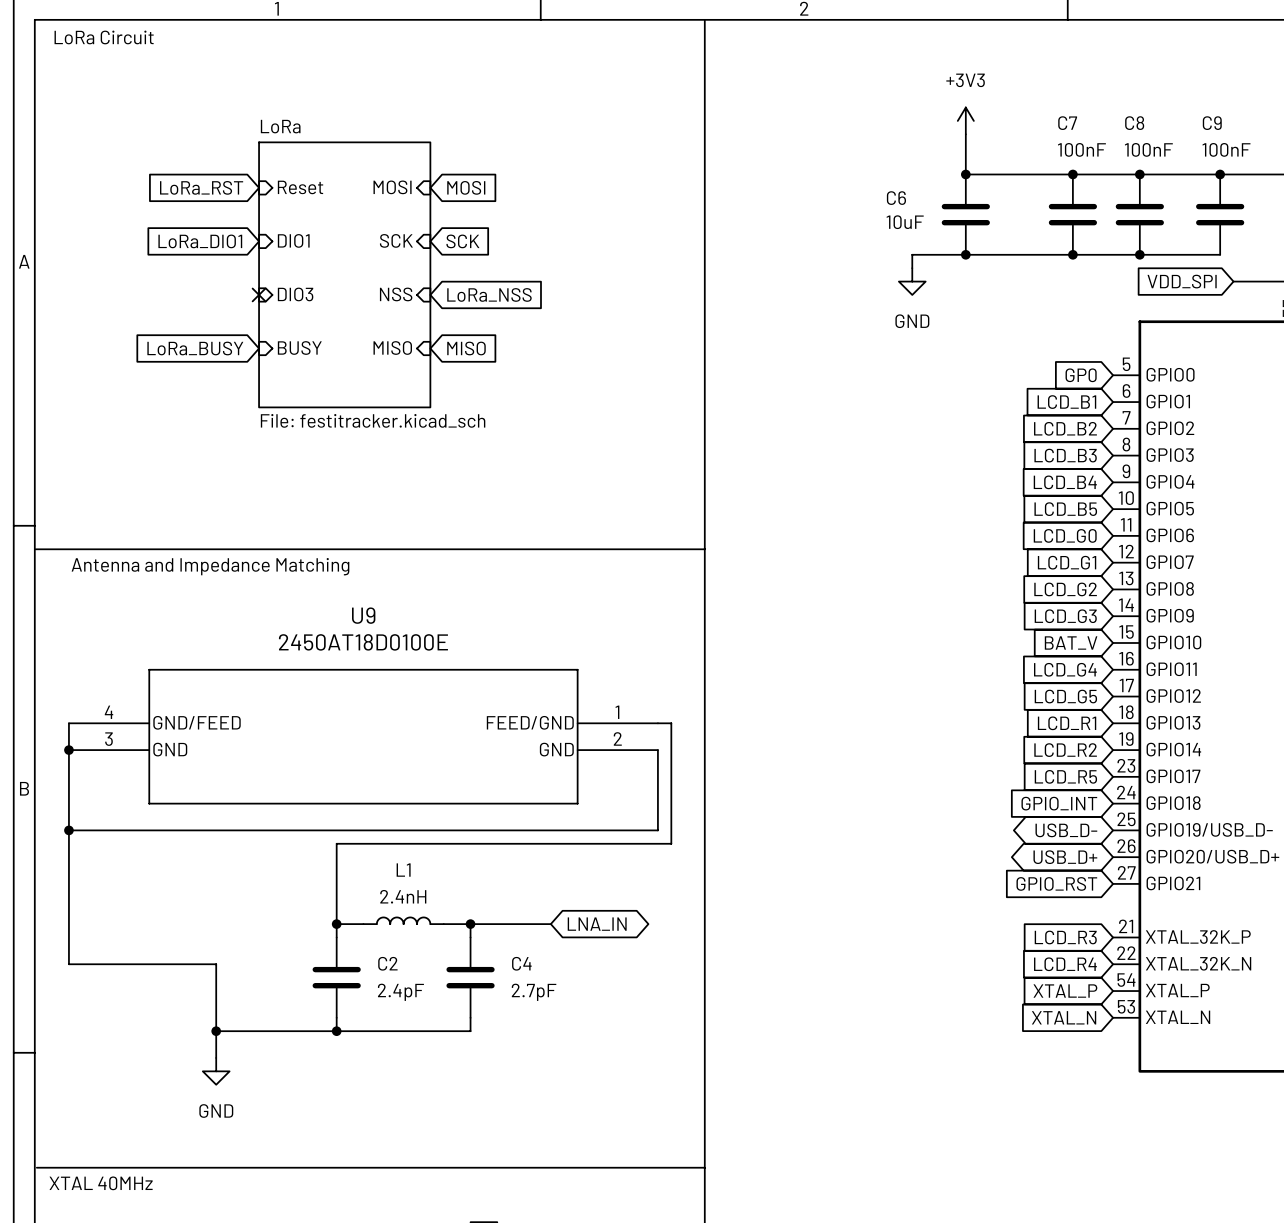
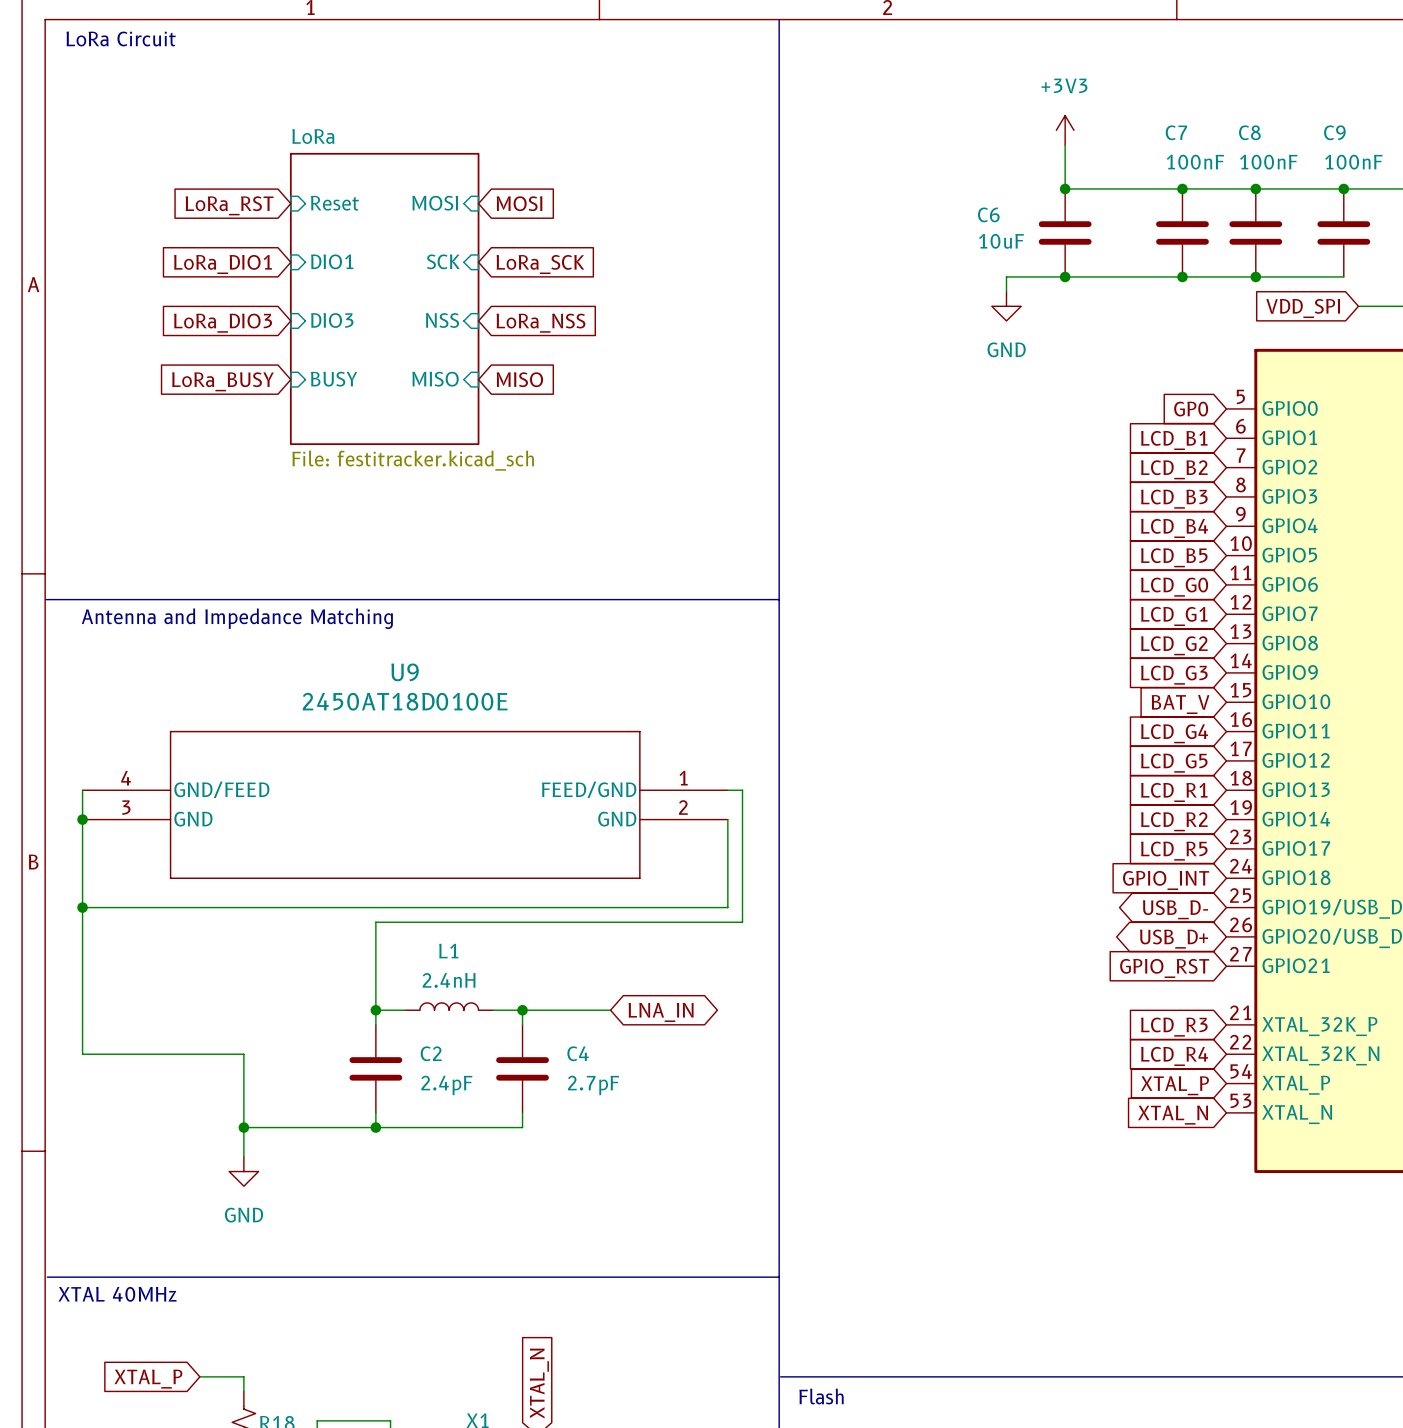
global label: SCK (462, 241) -> LoRa_SCK (540, 264)
global label: none -> LoRa_DIO3 (223, 323)
no-connect mark: (259, 294) -> none

